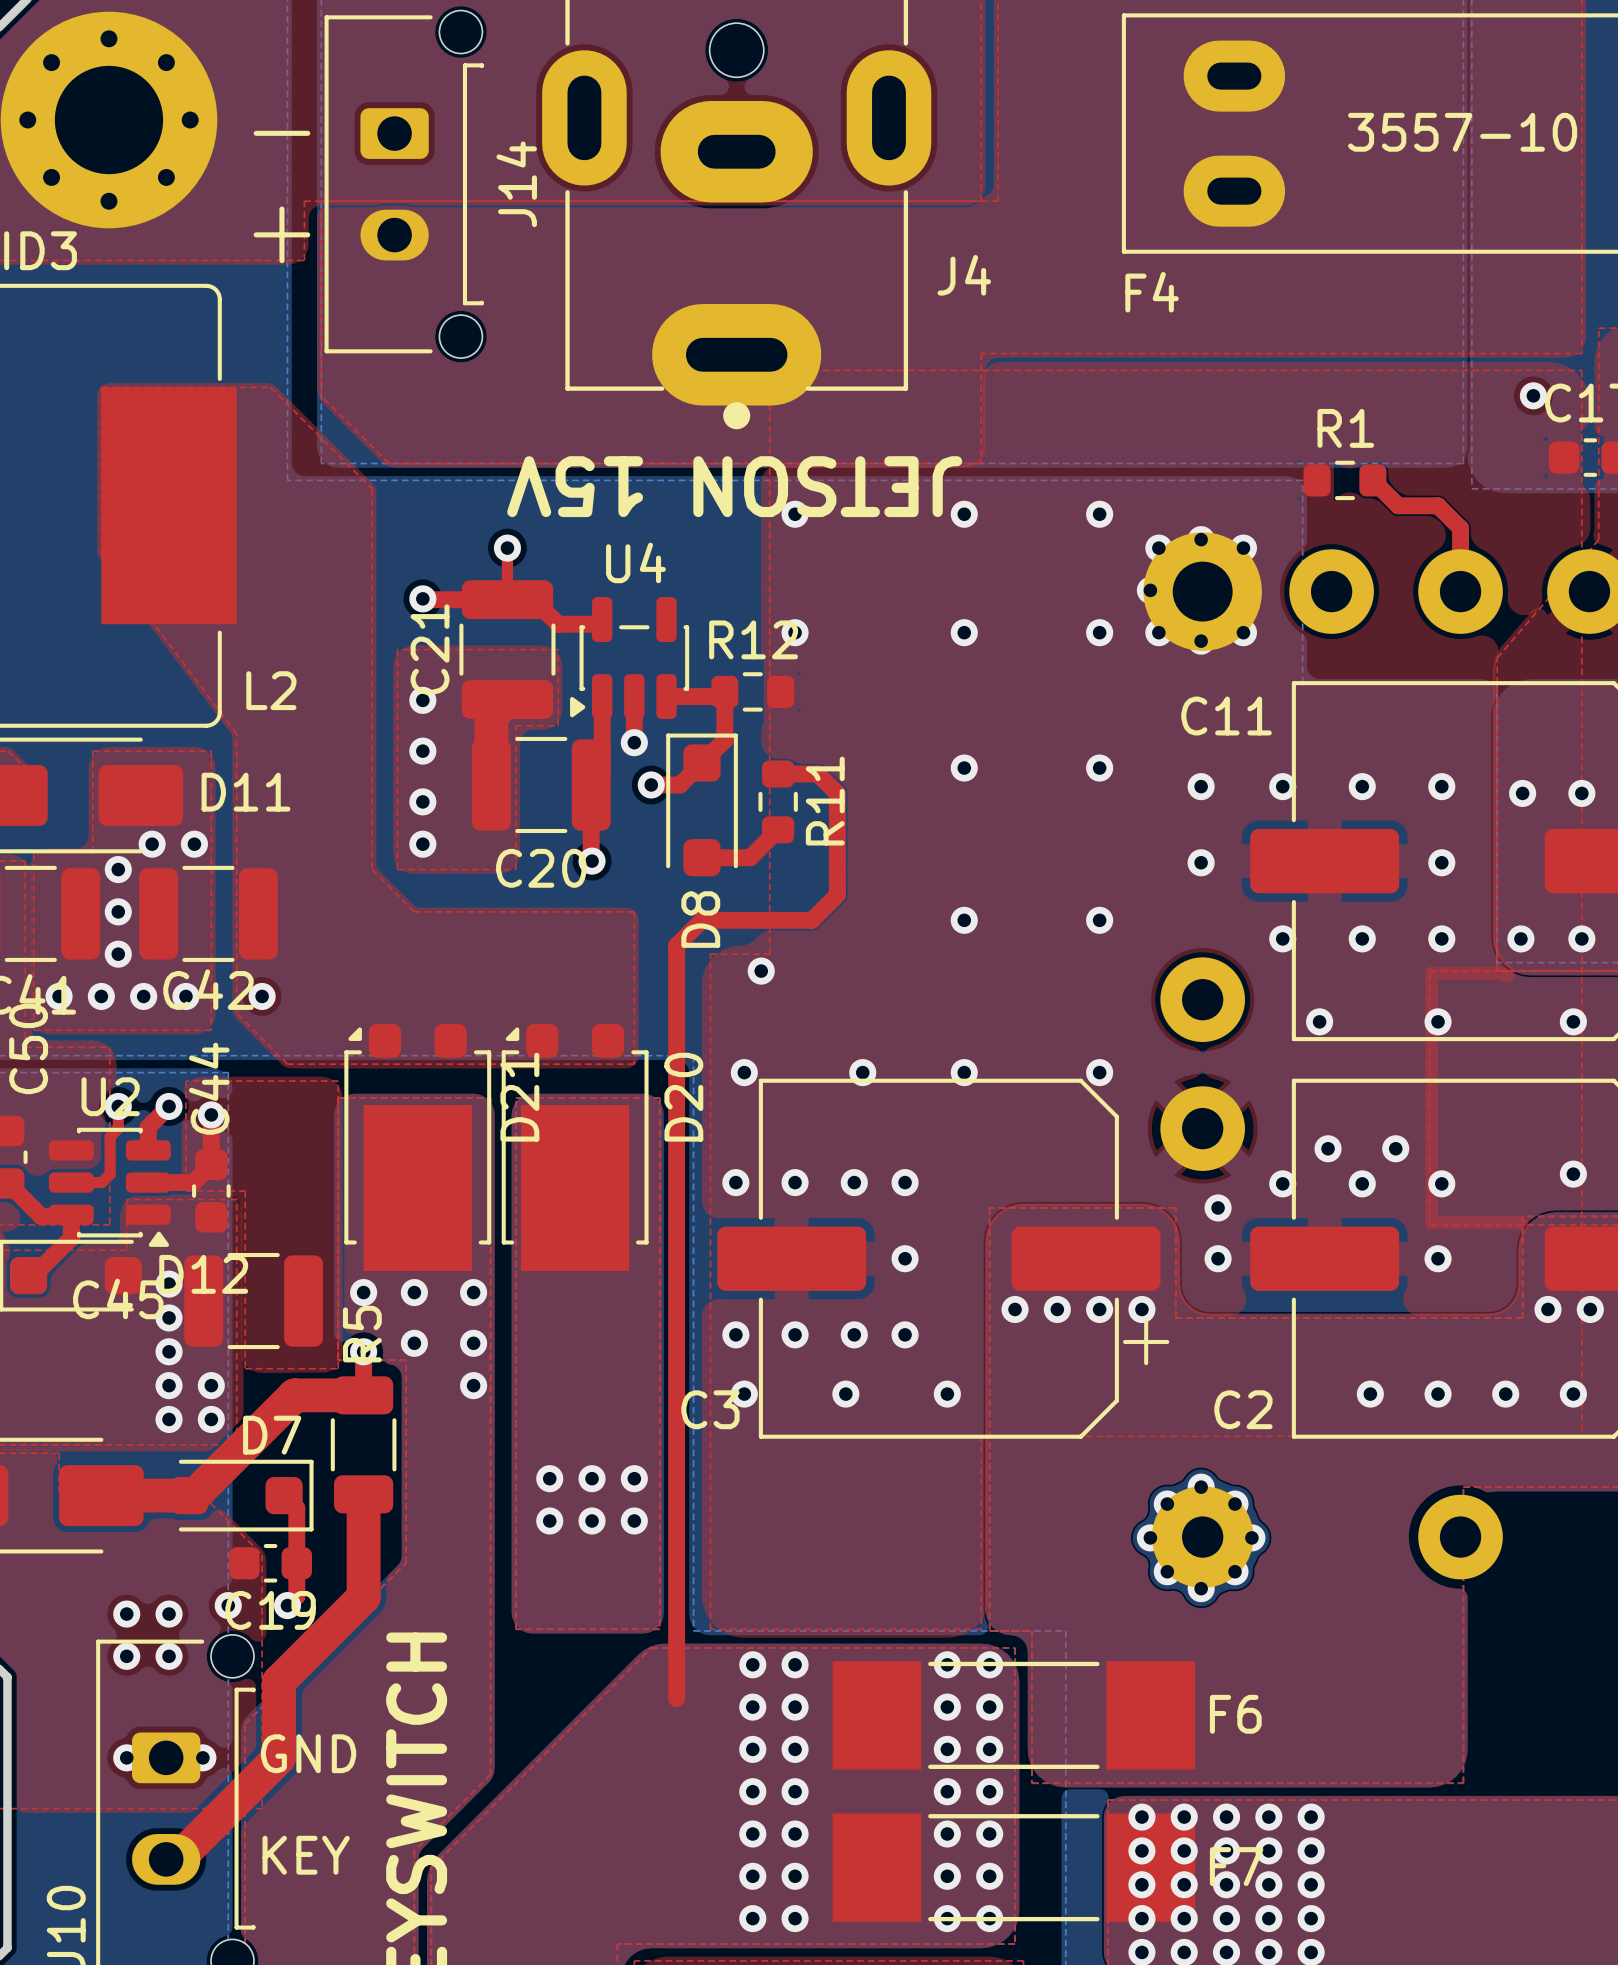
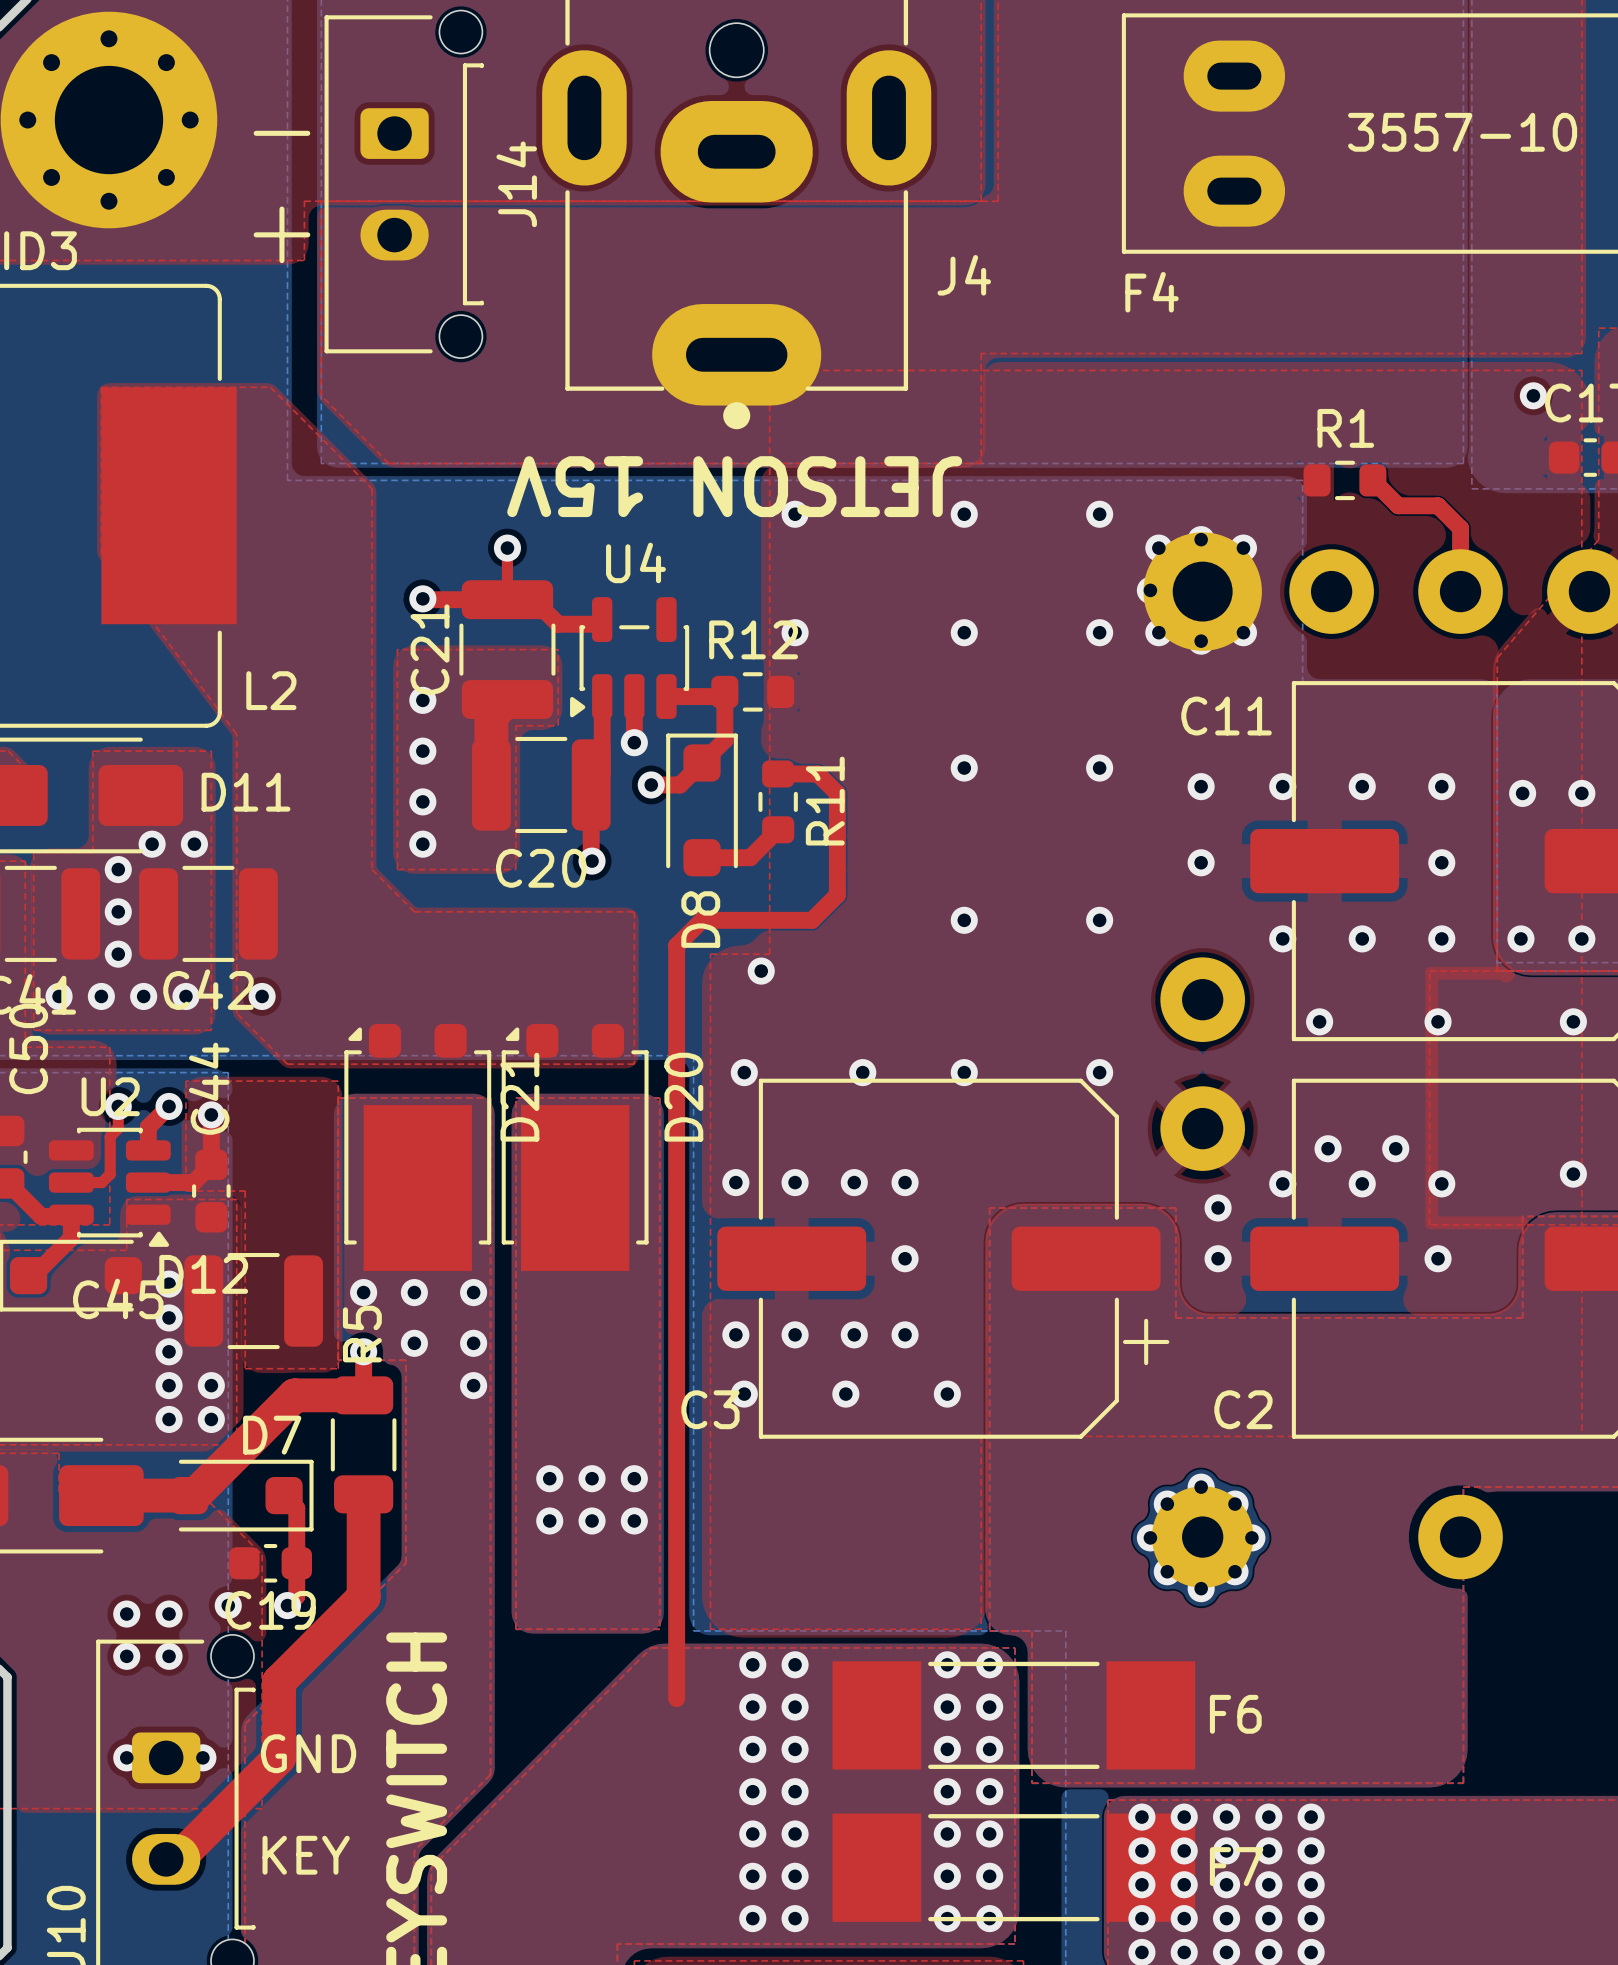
via: (1015, 1309) -> none
via: (1057, 1309) -> none
via: (1099, 1309) -> none
via: (1141, 1309) -> none
via: (1548, 1309) -> none
via: (1590, 1309) -> none
via: (1370, 1394) -> none
via: (1438, 1394) -> none
via: (1505, 1394) -> none
via: (1573, 1394) -> none

